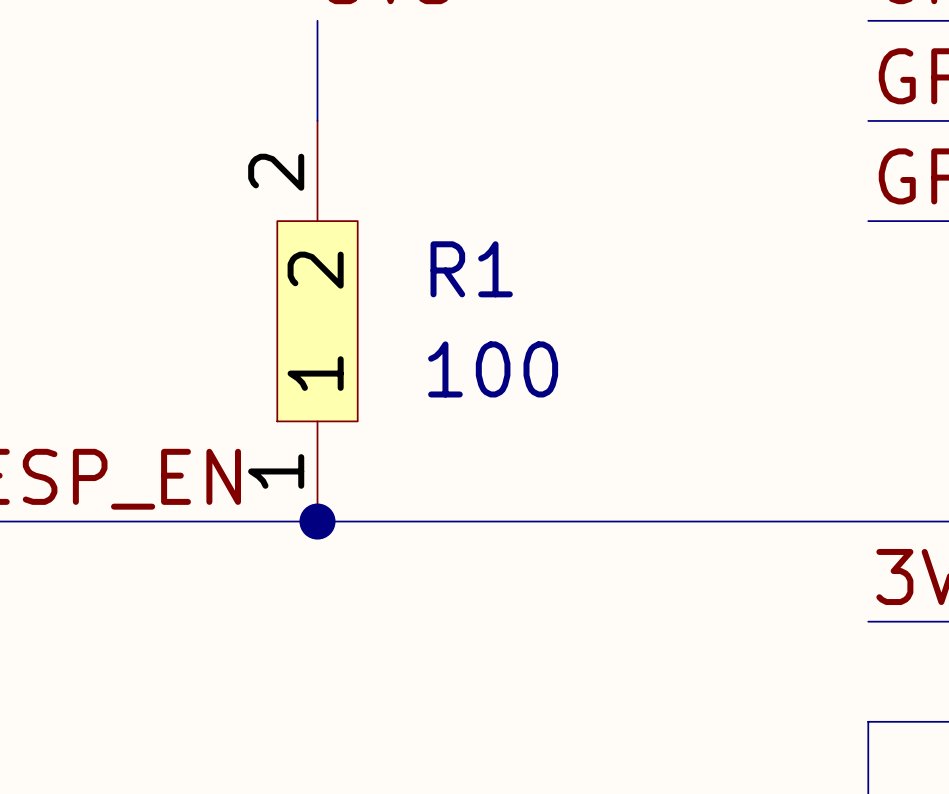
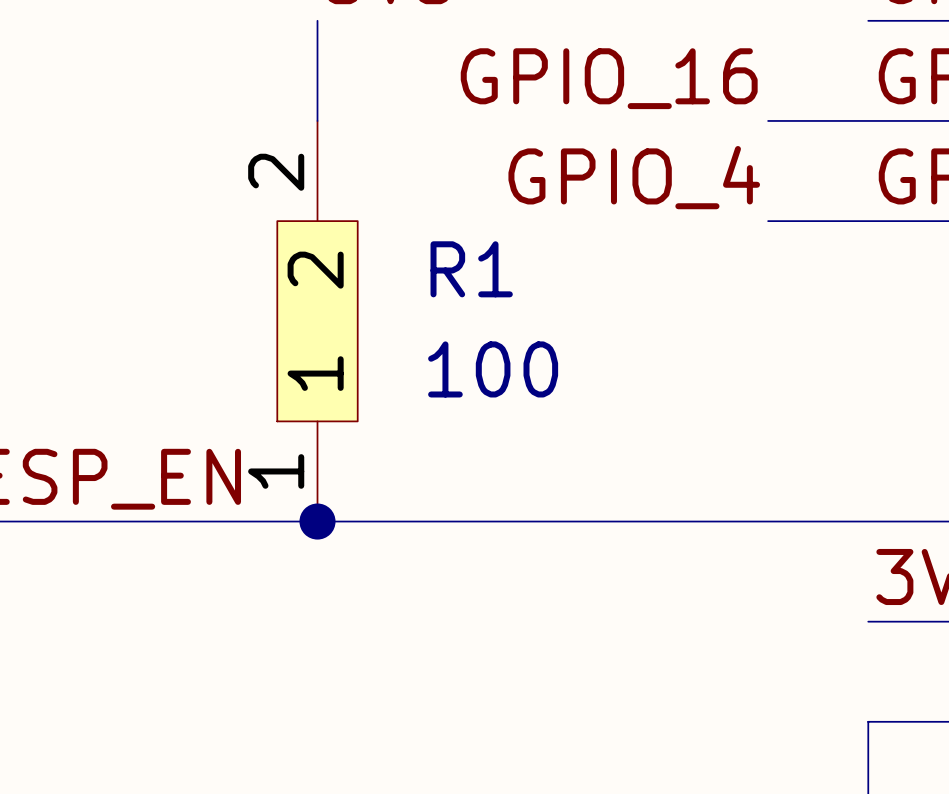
label: none -> GPIO_16 (609, 78)
wire: none -> (768, 120) (868, 120)
label: none -> GPIO_4 (634, 177)
wire: none -> (768, 221) (868, 221)

